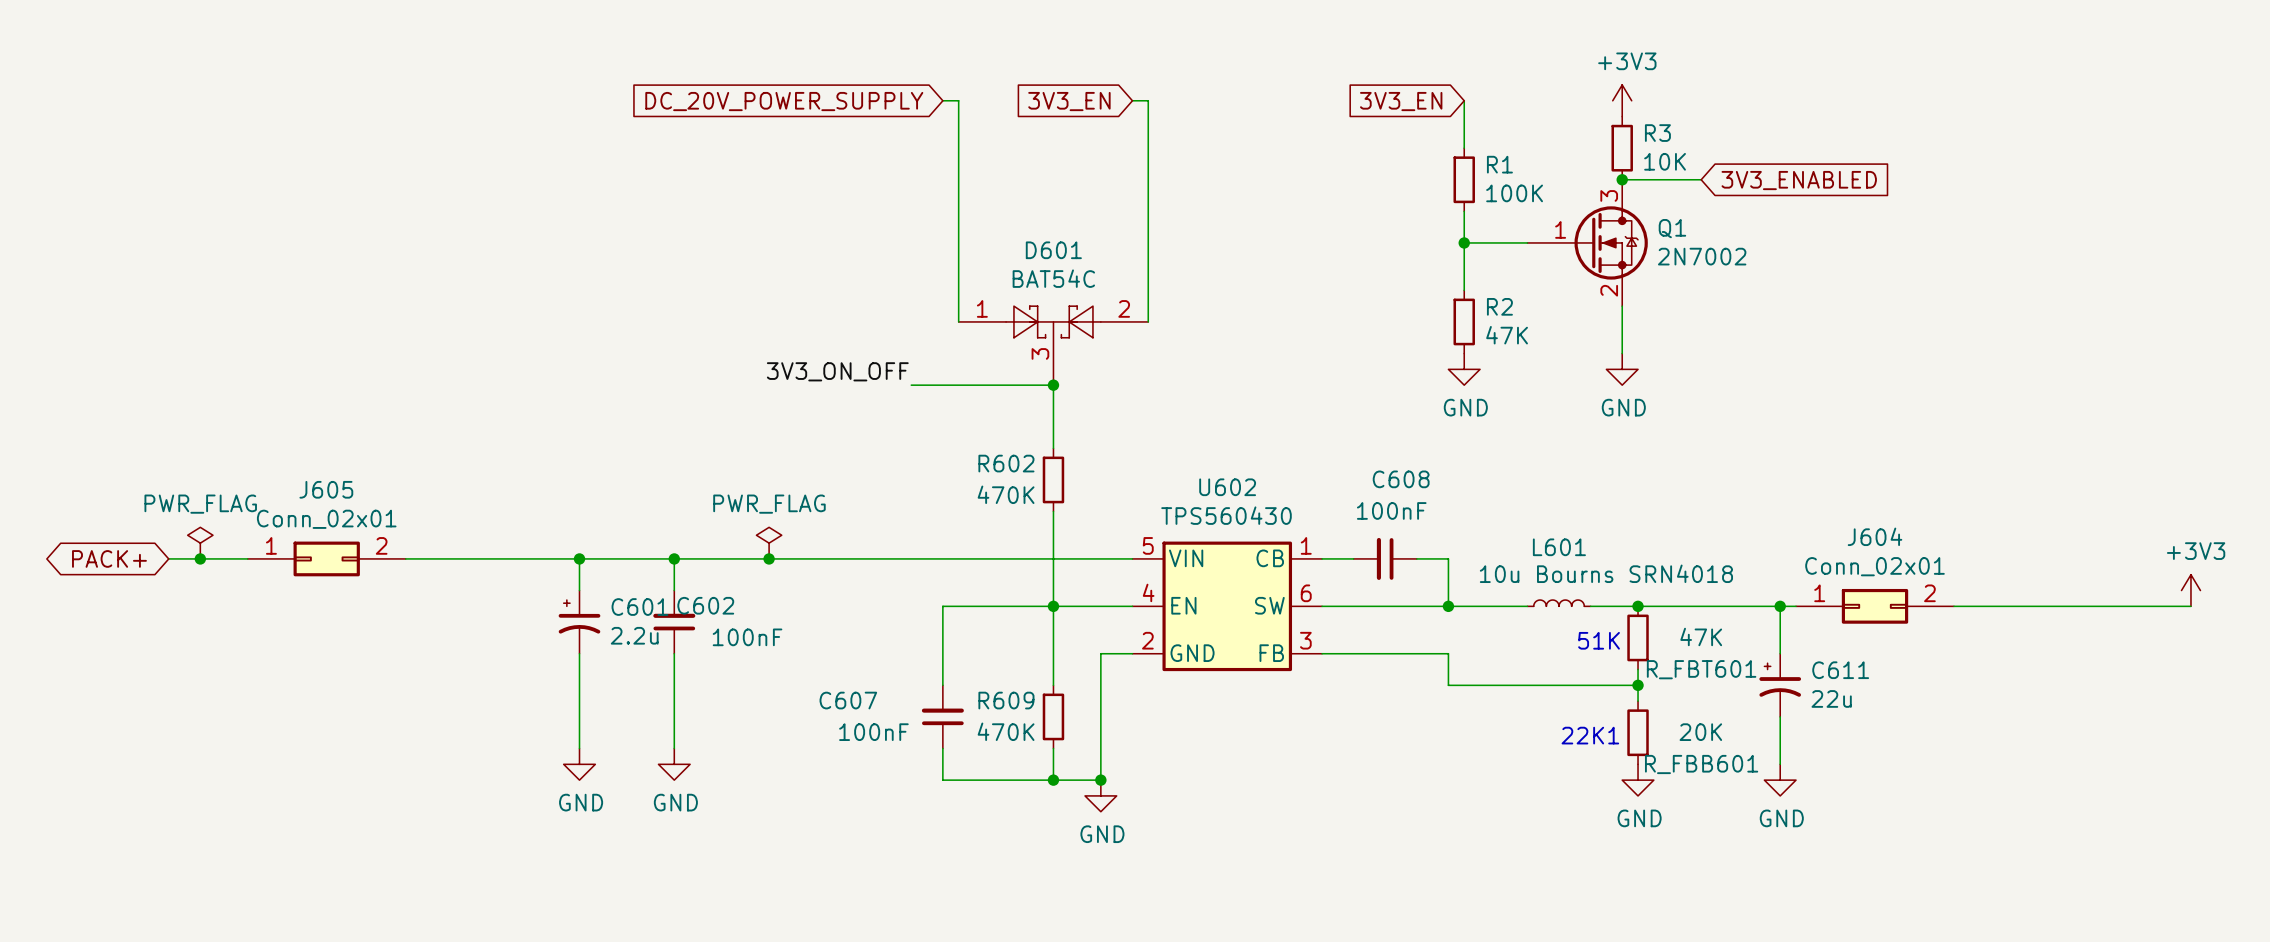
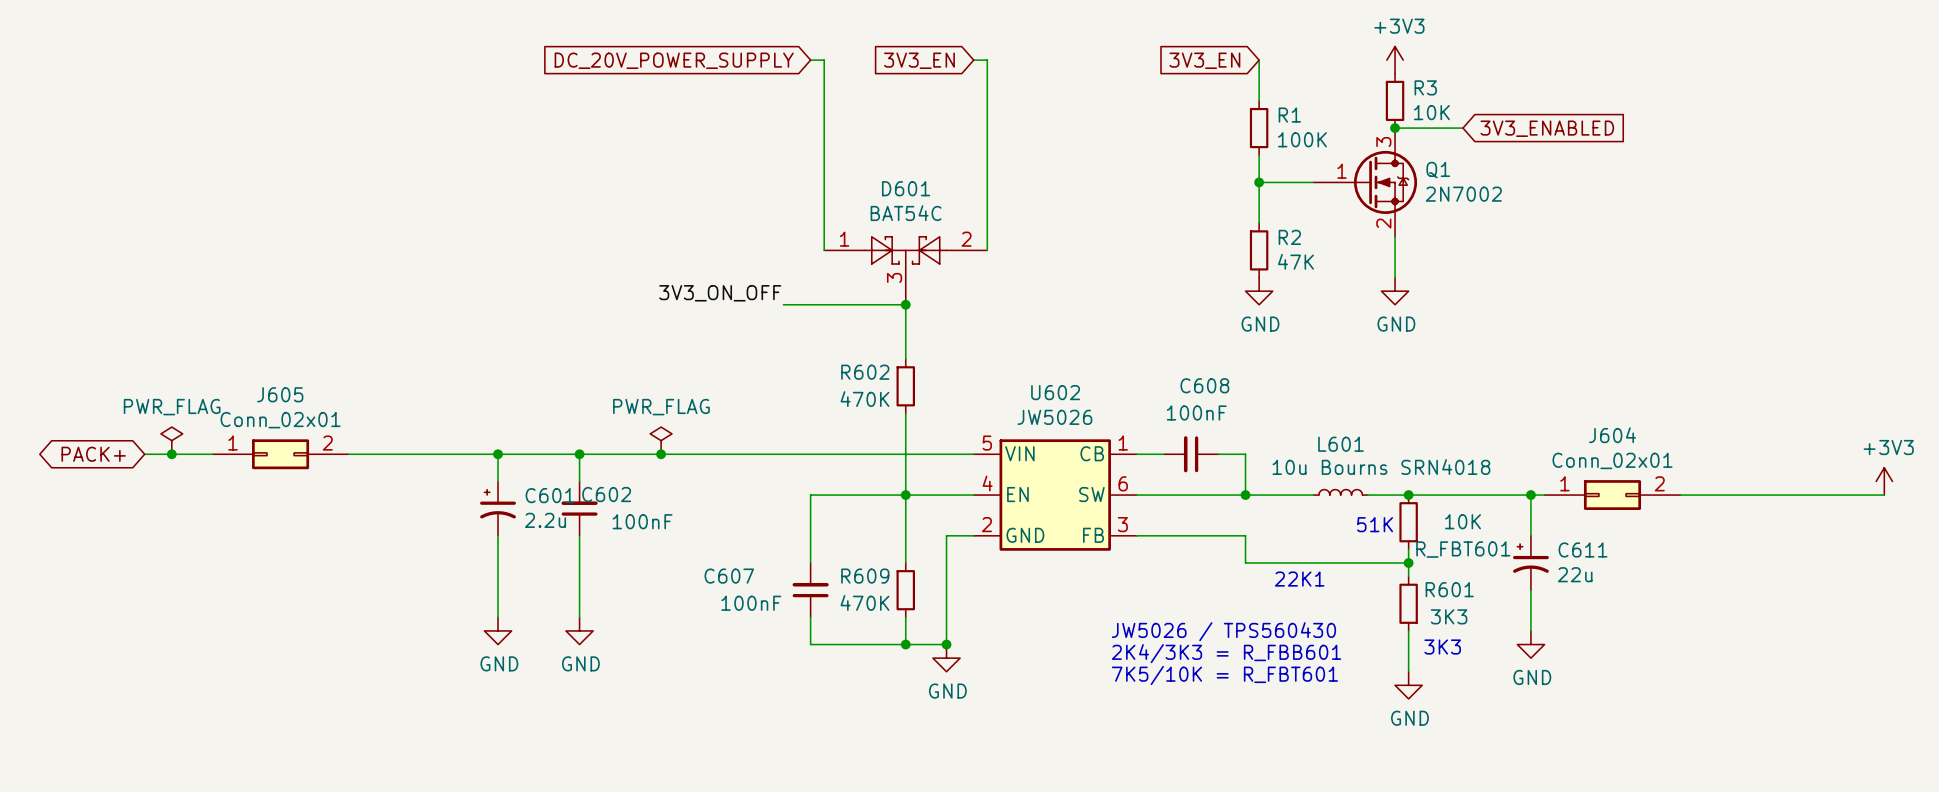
U602 value: TPS560430 (1226, 515) -> JW5026 (1054, 417)
R_FBT601 value: 47K (1701, 636) -> 10K (1462, 521)
R_FBB601 value: 20K (1700, 732) -> 3K3 (1449, 616)
text position: 22K1 (1590, 735) -> 22K1 (1299, 579)
wire: none -> (1408, 630) (1408, 671)
R_FBB601 name: R_FBB601 (1701, 764) -> R601 (1449, 589)
text: none -> JW5026 / TPS560430 (1223, 631)
power symbol position: GND (1638, 780) -> GND (1408, 685)
text: none -> 3K3 (1442, 647)
text: none -> 2K4/3K3 = R_FBB601 (1226, 653)
text: none -> 7K5/10K = R_FBT601 (1224, 675)

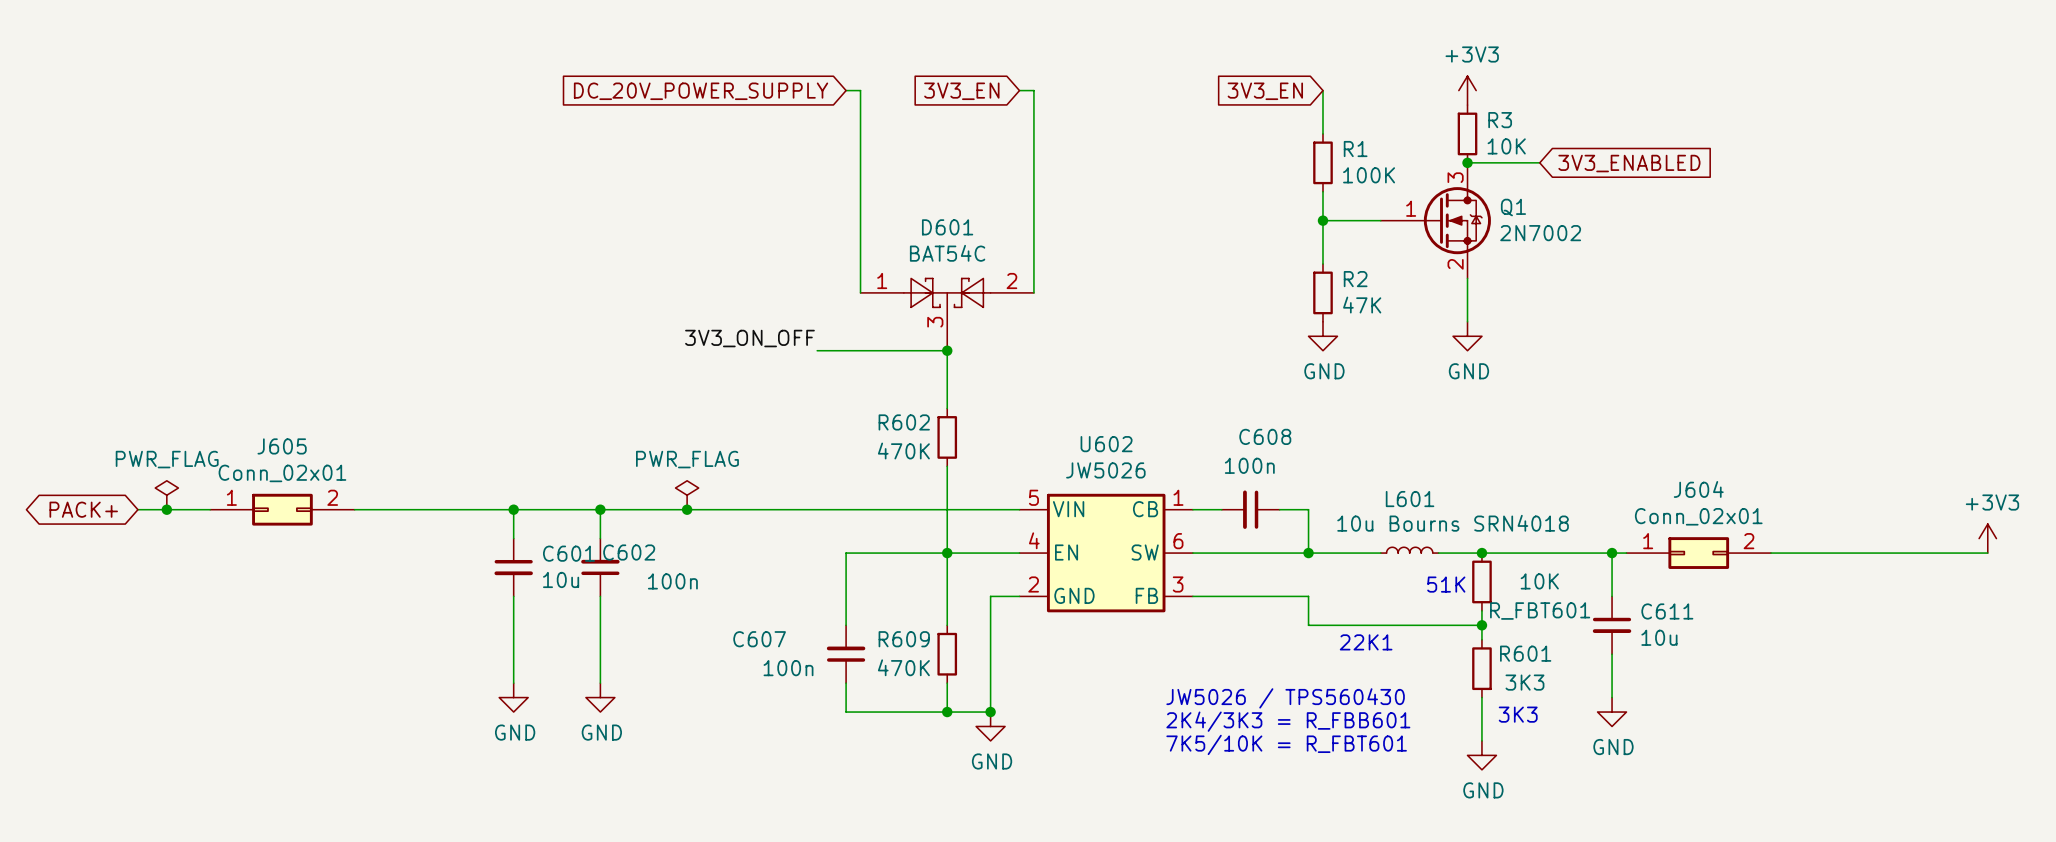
C608 value: 100nF (1196, 412) -> 100n (1249, 465)
C601 symbol: [480, 481, 516, 536] -> [494, 538, 533, 597]
C601 value: 2.2u (545, 520) -> 10u (561, 579)
C602 value: 100nF (642, 521) -> 100n (672, 581)
C611 symbol: [1513, 535, 1549, 591] -> [1592, 596, 1632, 655]
C611 value: 22u (1575, 574) -> 10u (1659, 637)
C607 value: 100nF (751, 603) -> 100n (788, 668)

